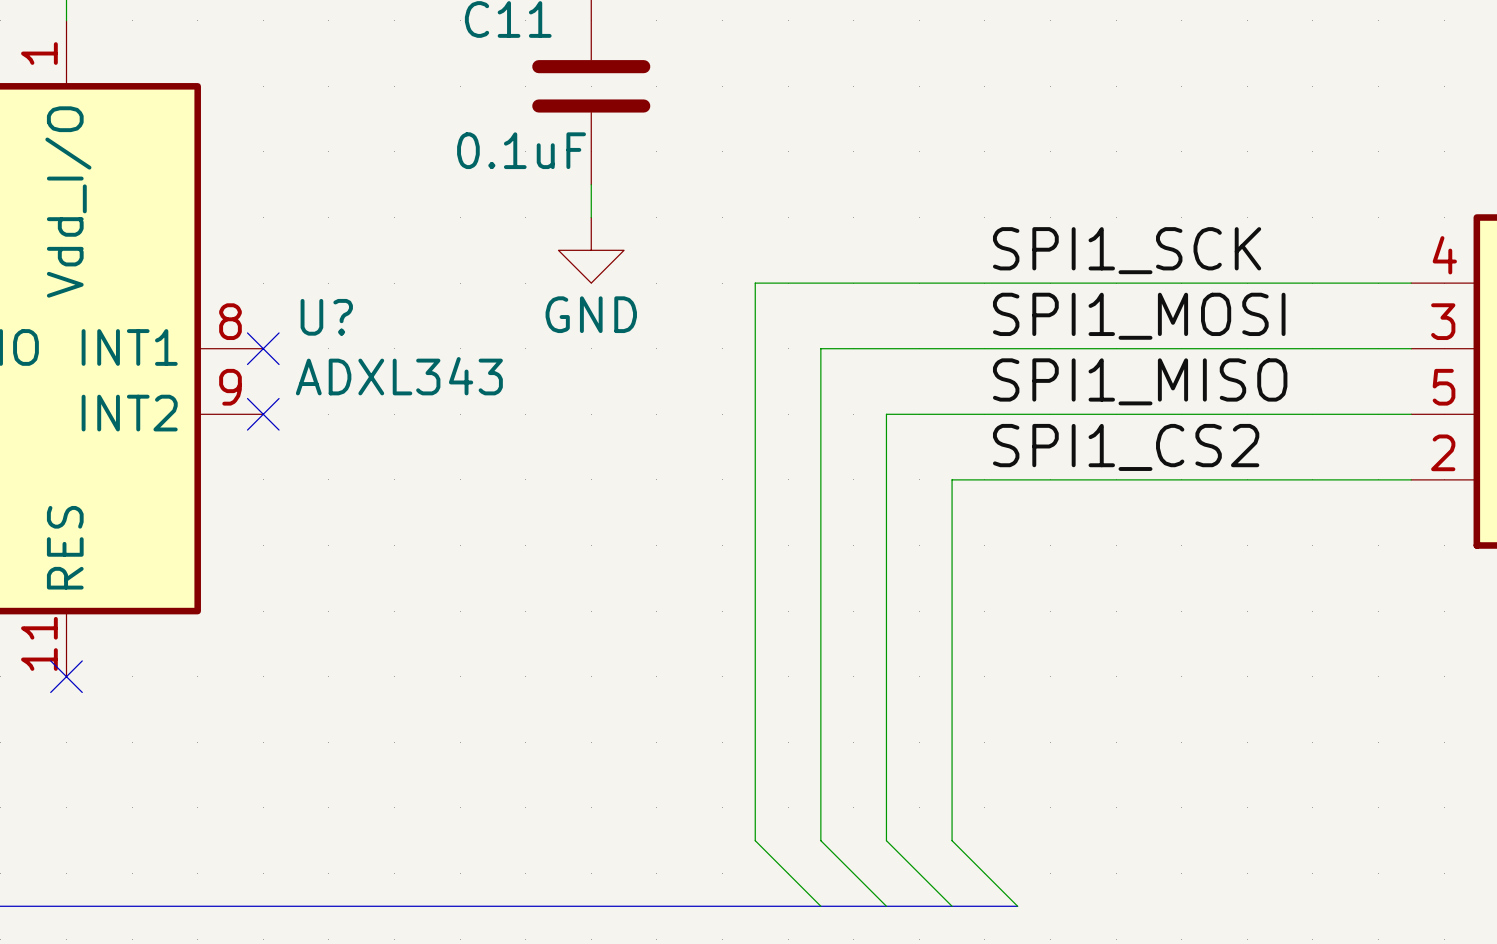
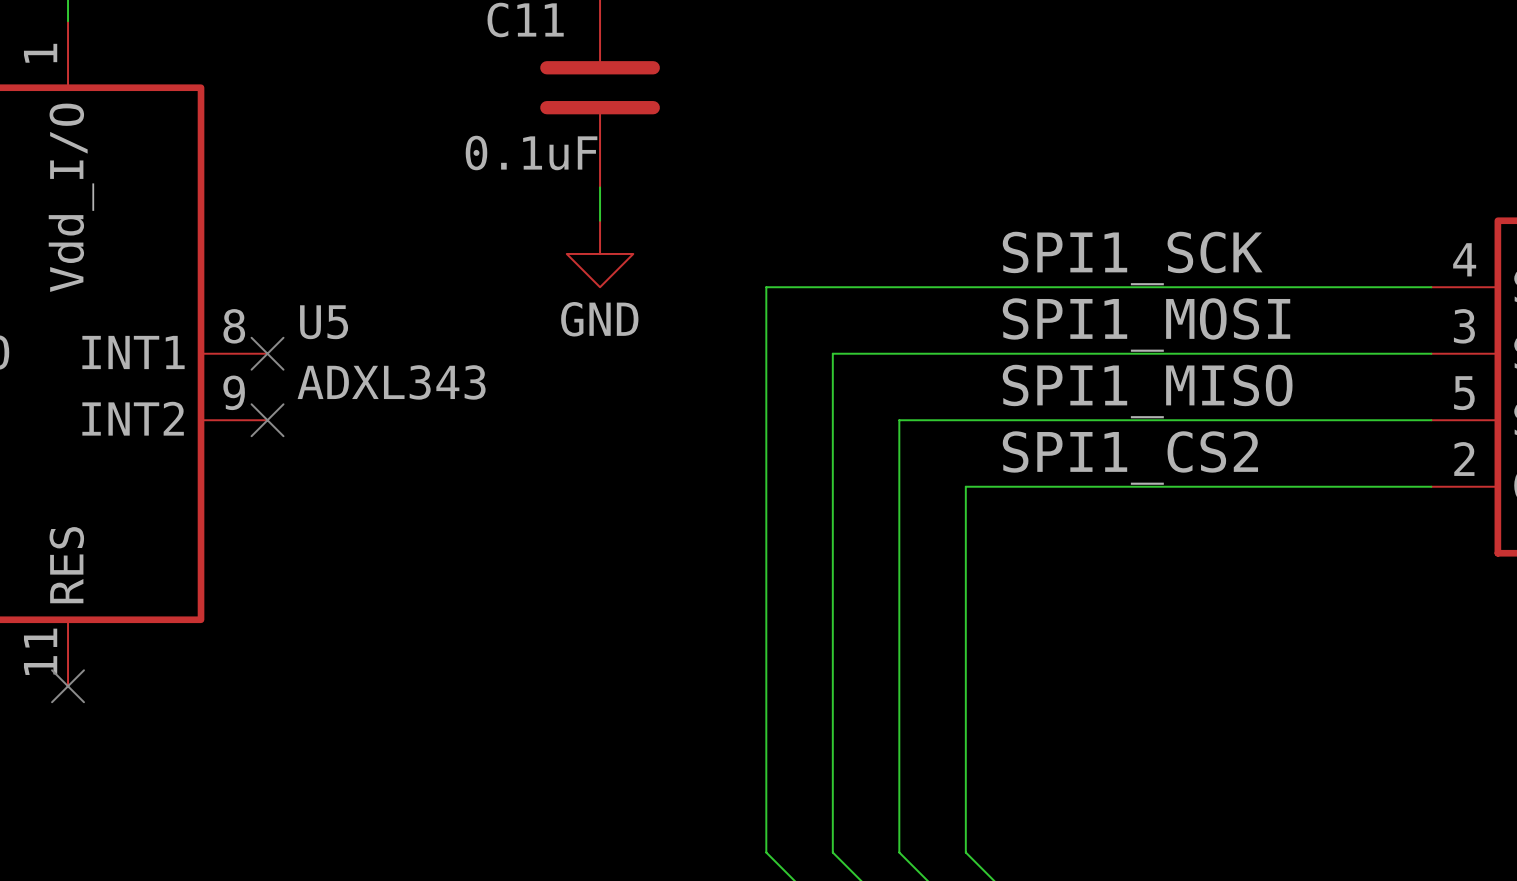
U? name: U? (326, 317) -> U5 (324, 322)

